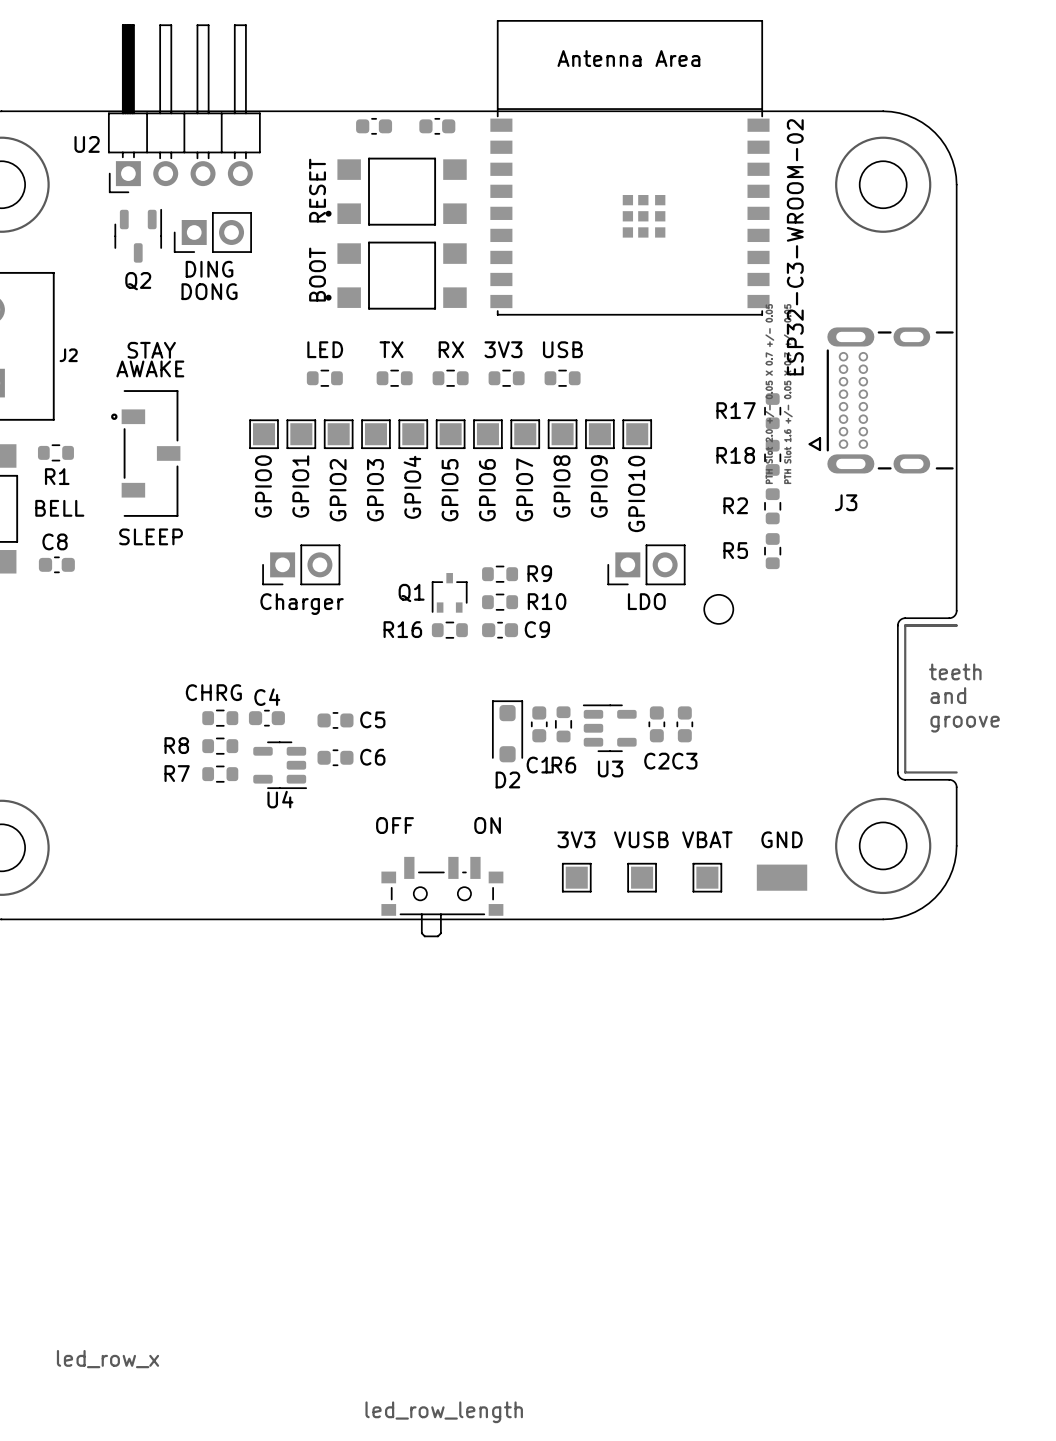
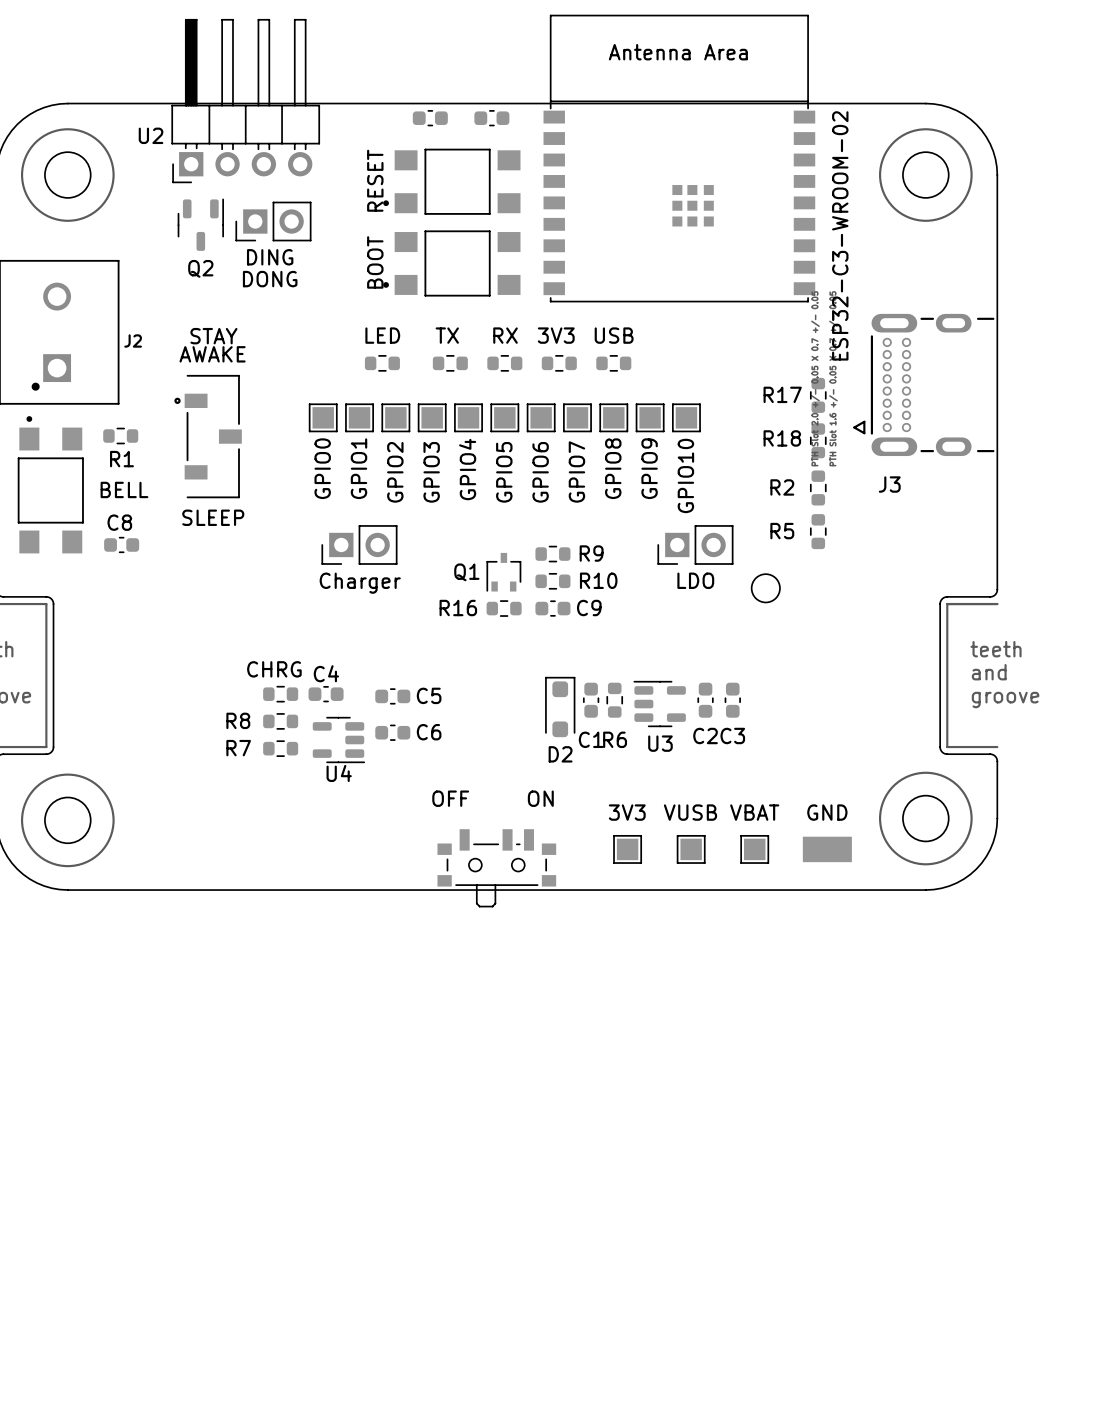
text: led_row_x (108, 1359) -> none
text: led_row_length (444, 1412) -> none

